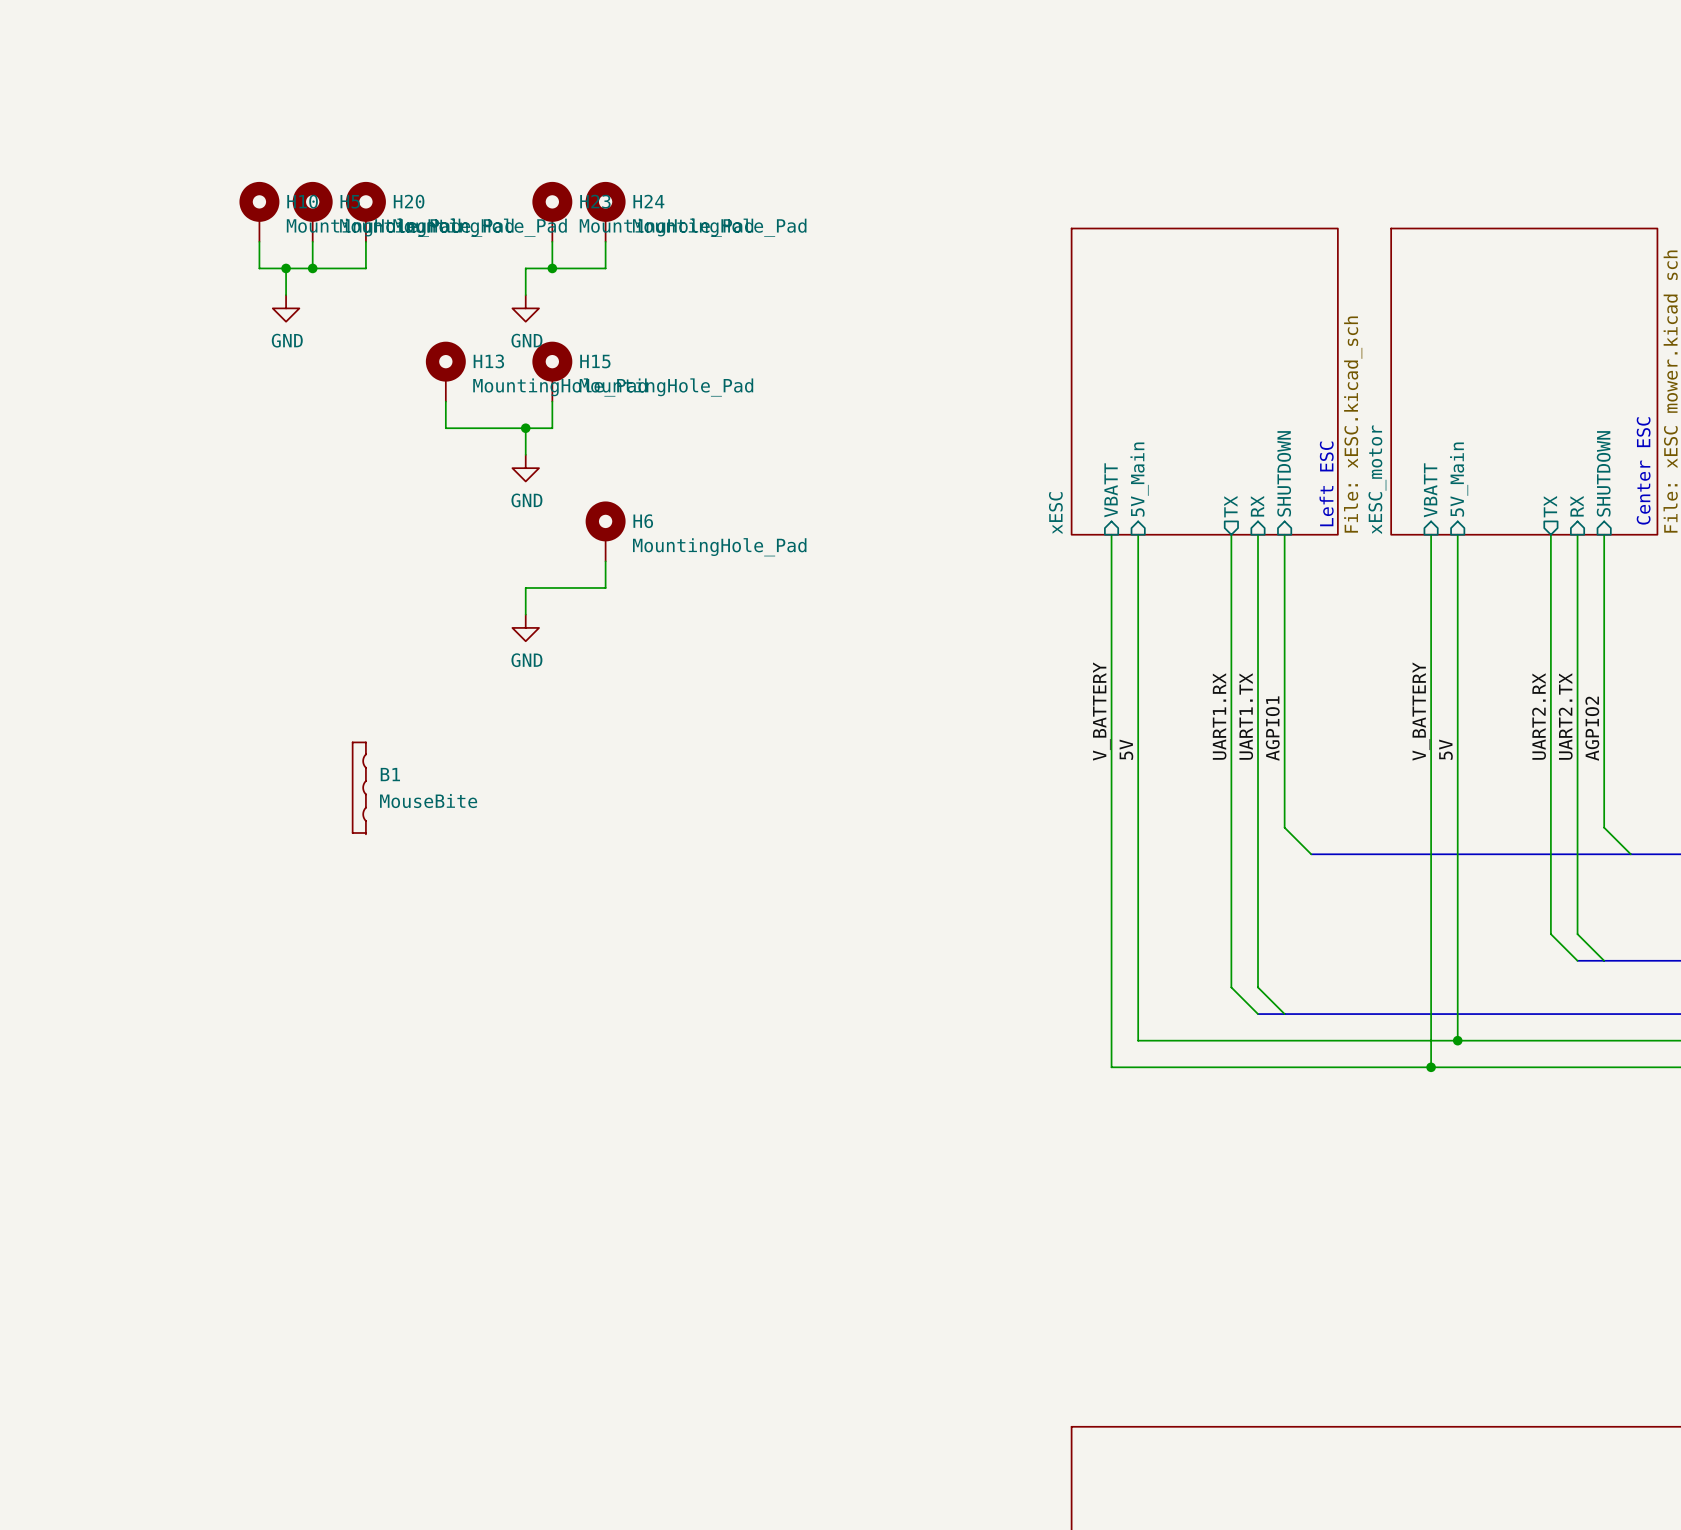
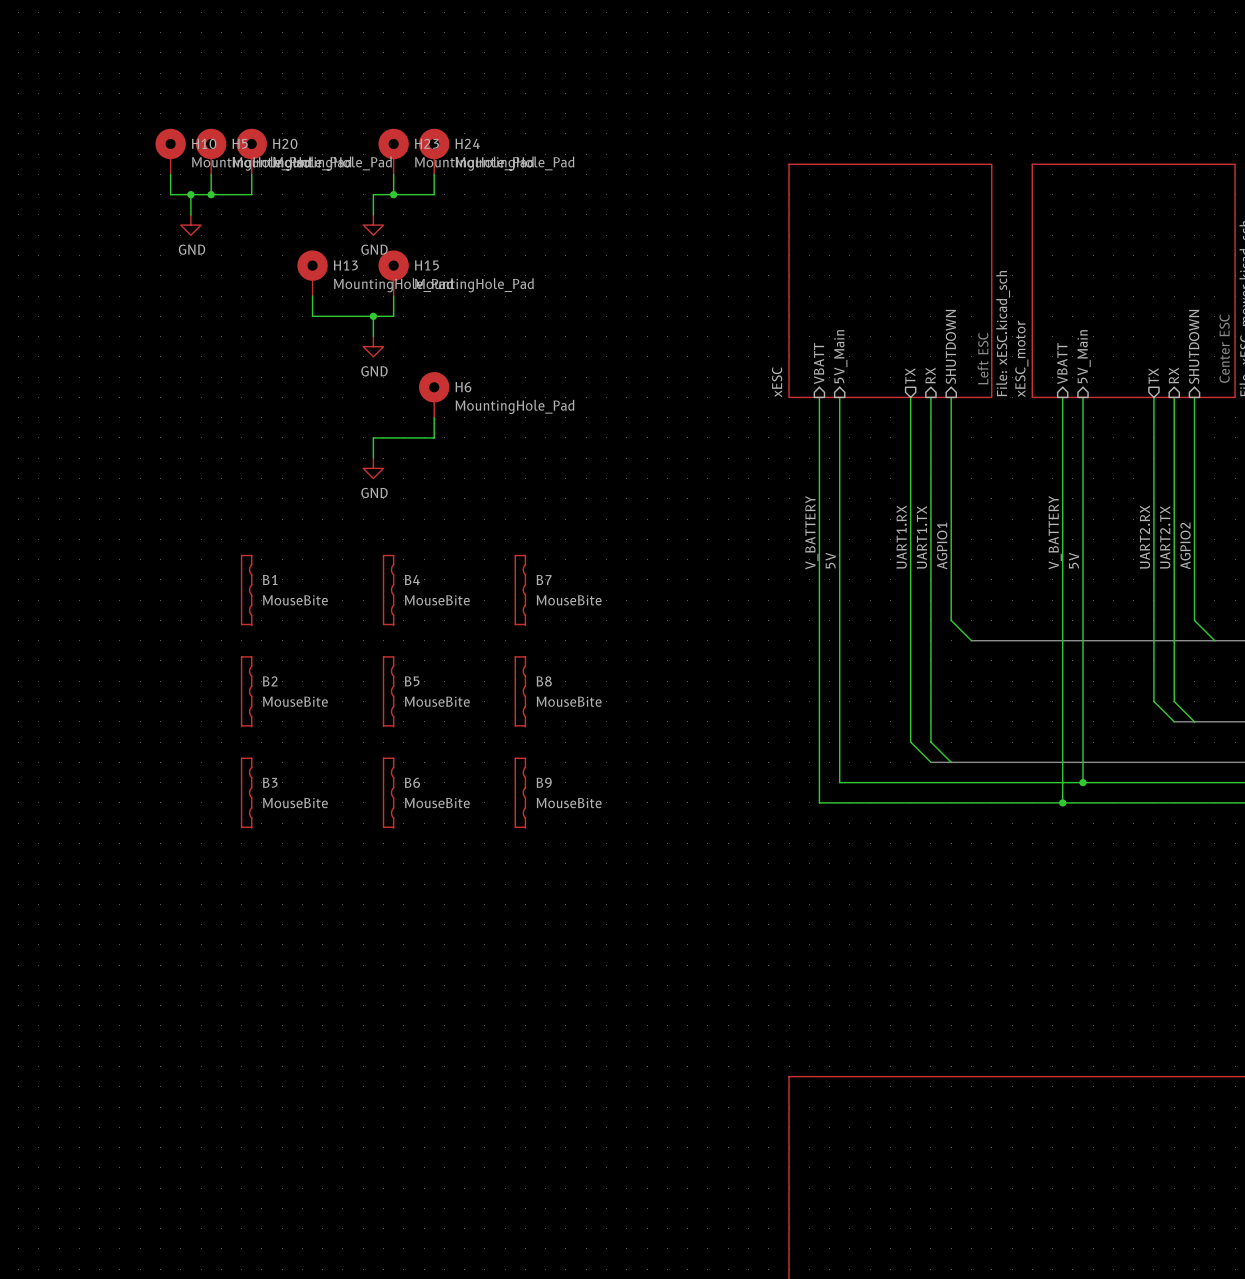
B4: none -> MouseBite (388, 590)
B7: none -> MouseBite (520, 590)
B2: none -> MouseBite (246, 691)
B5: none -> MouseBite (388, 691)
B8: none -> MouseBite (520, 691)
B3: none -> MouseBite (246, 793)
B6: none -> MouseBite (388, 793)
B9: none -> MouseBite (520, 793)

